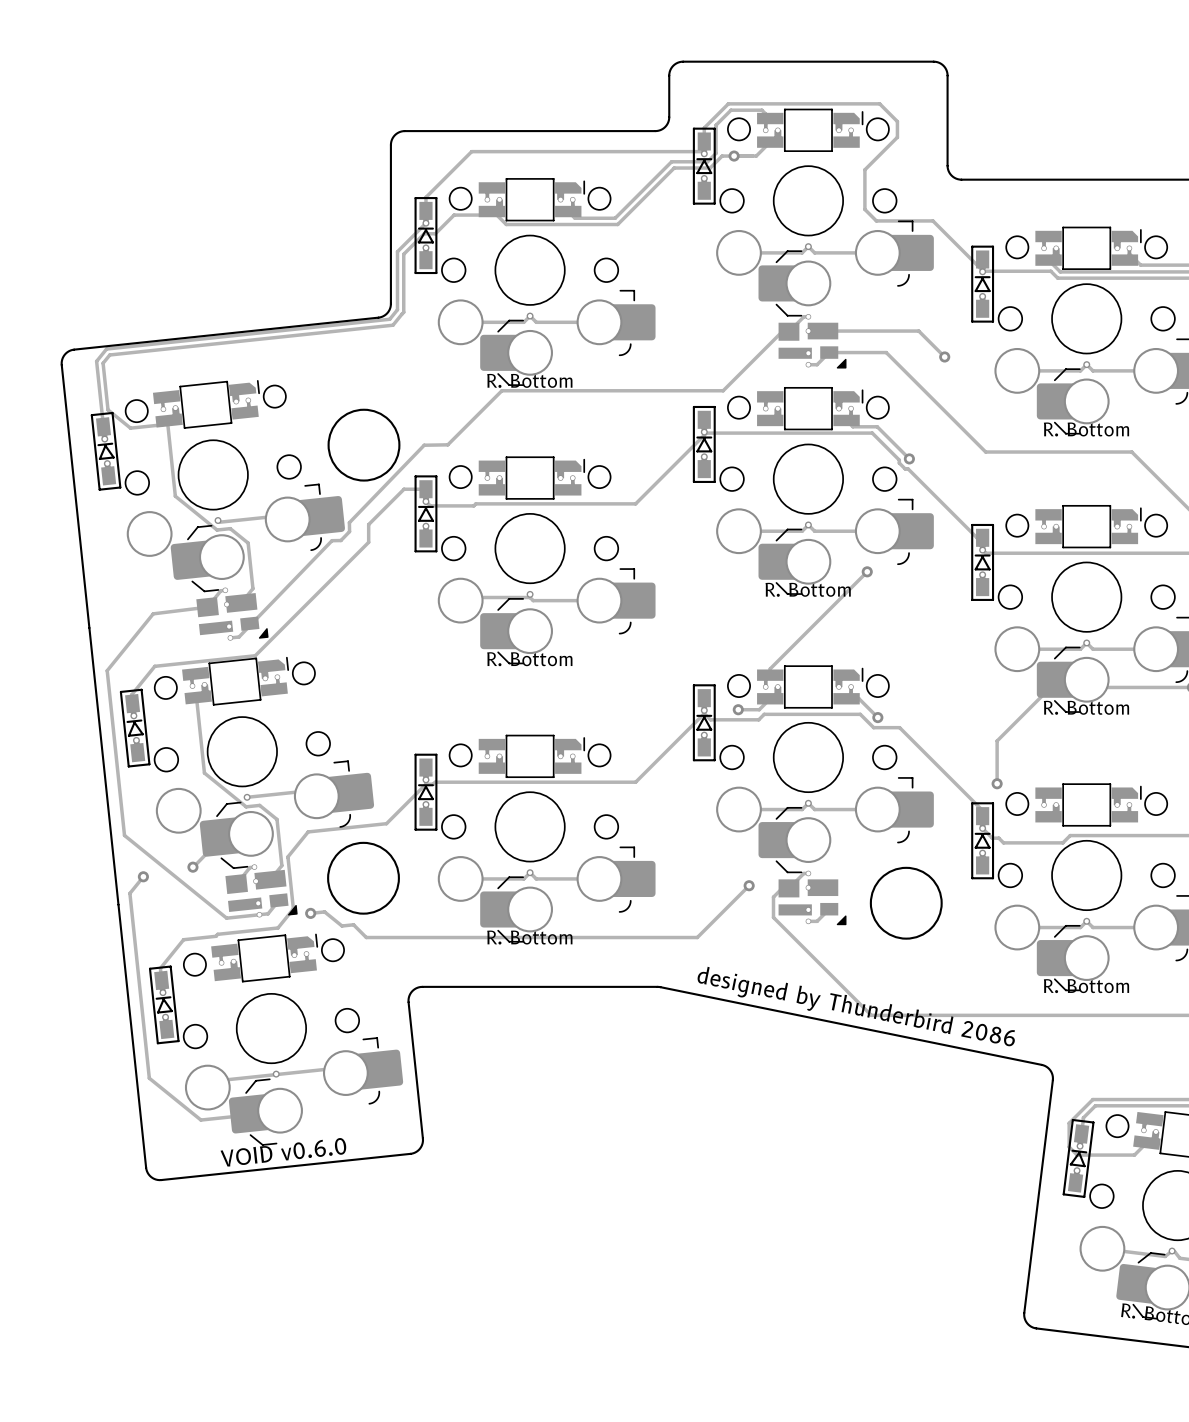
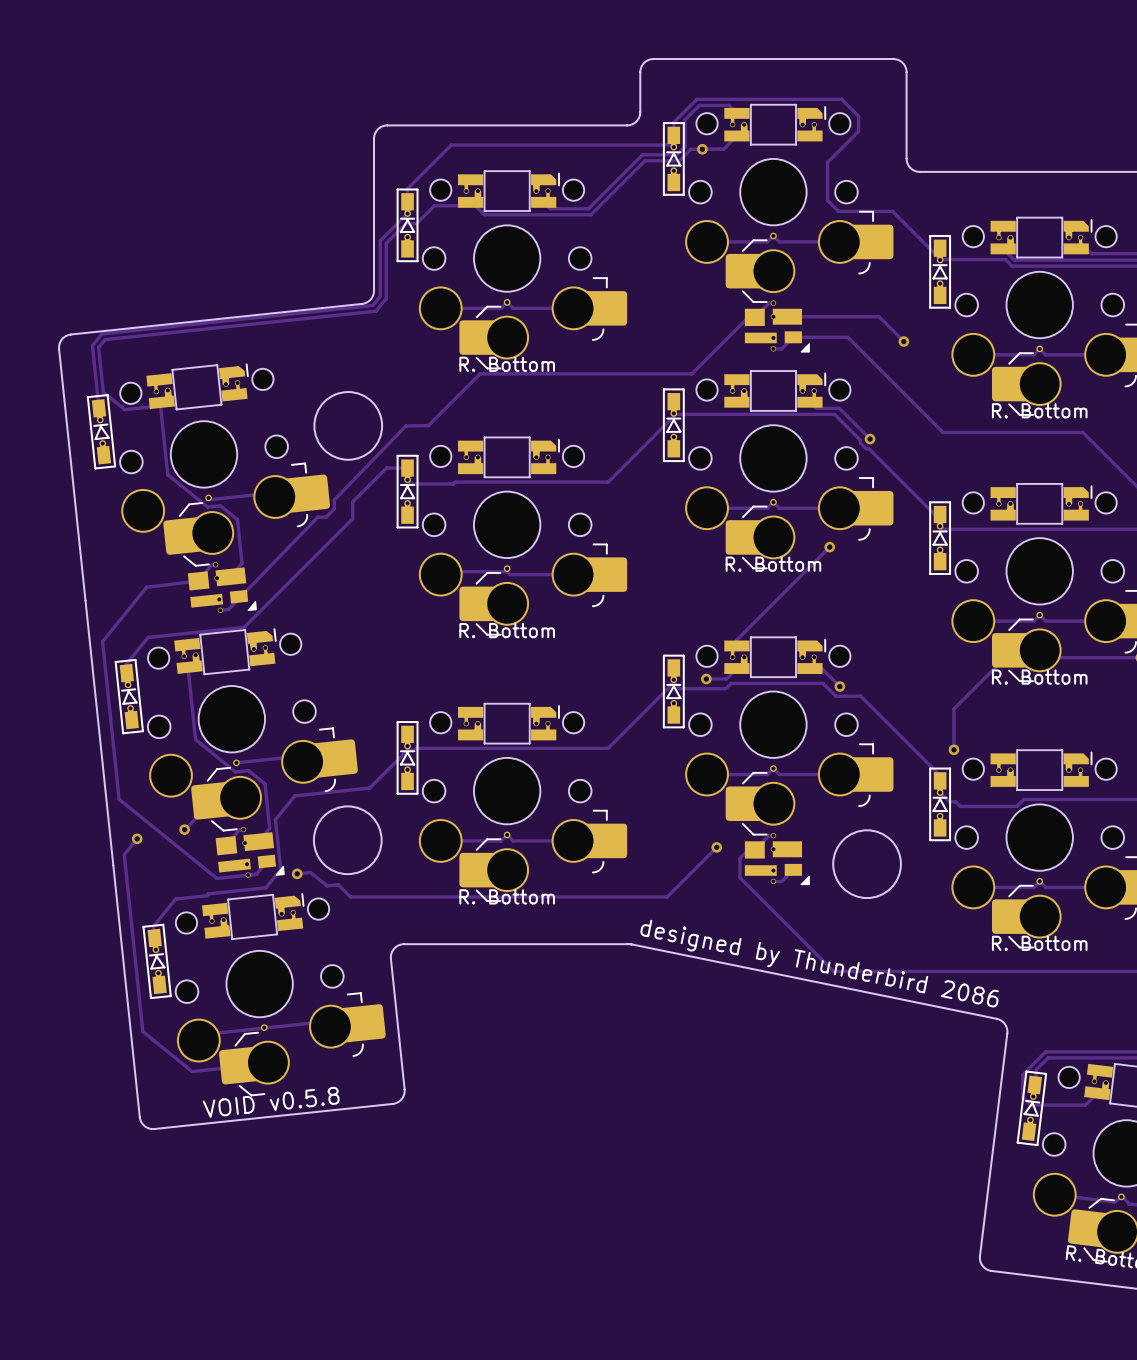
text: VOID v0.6.0 (283, 1152) -> VOID v0.5.8 (271, 1102)

